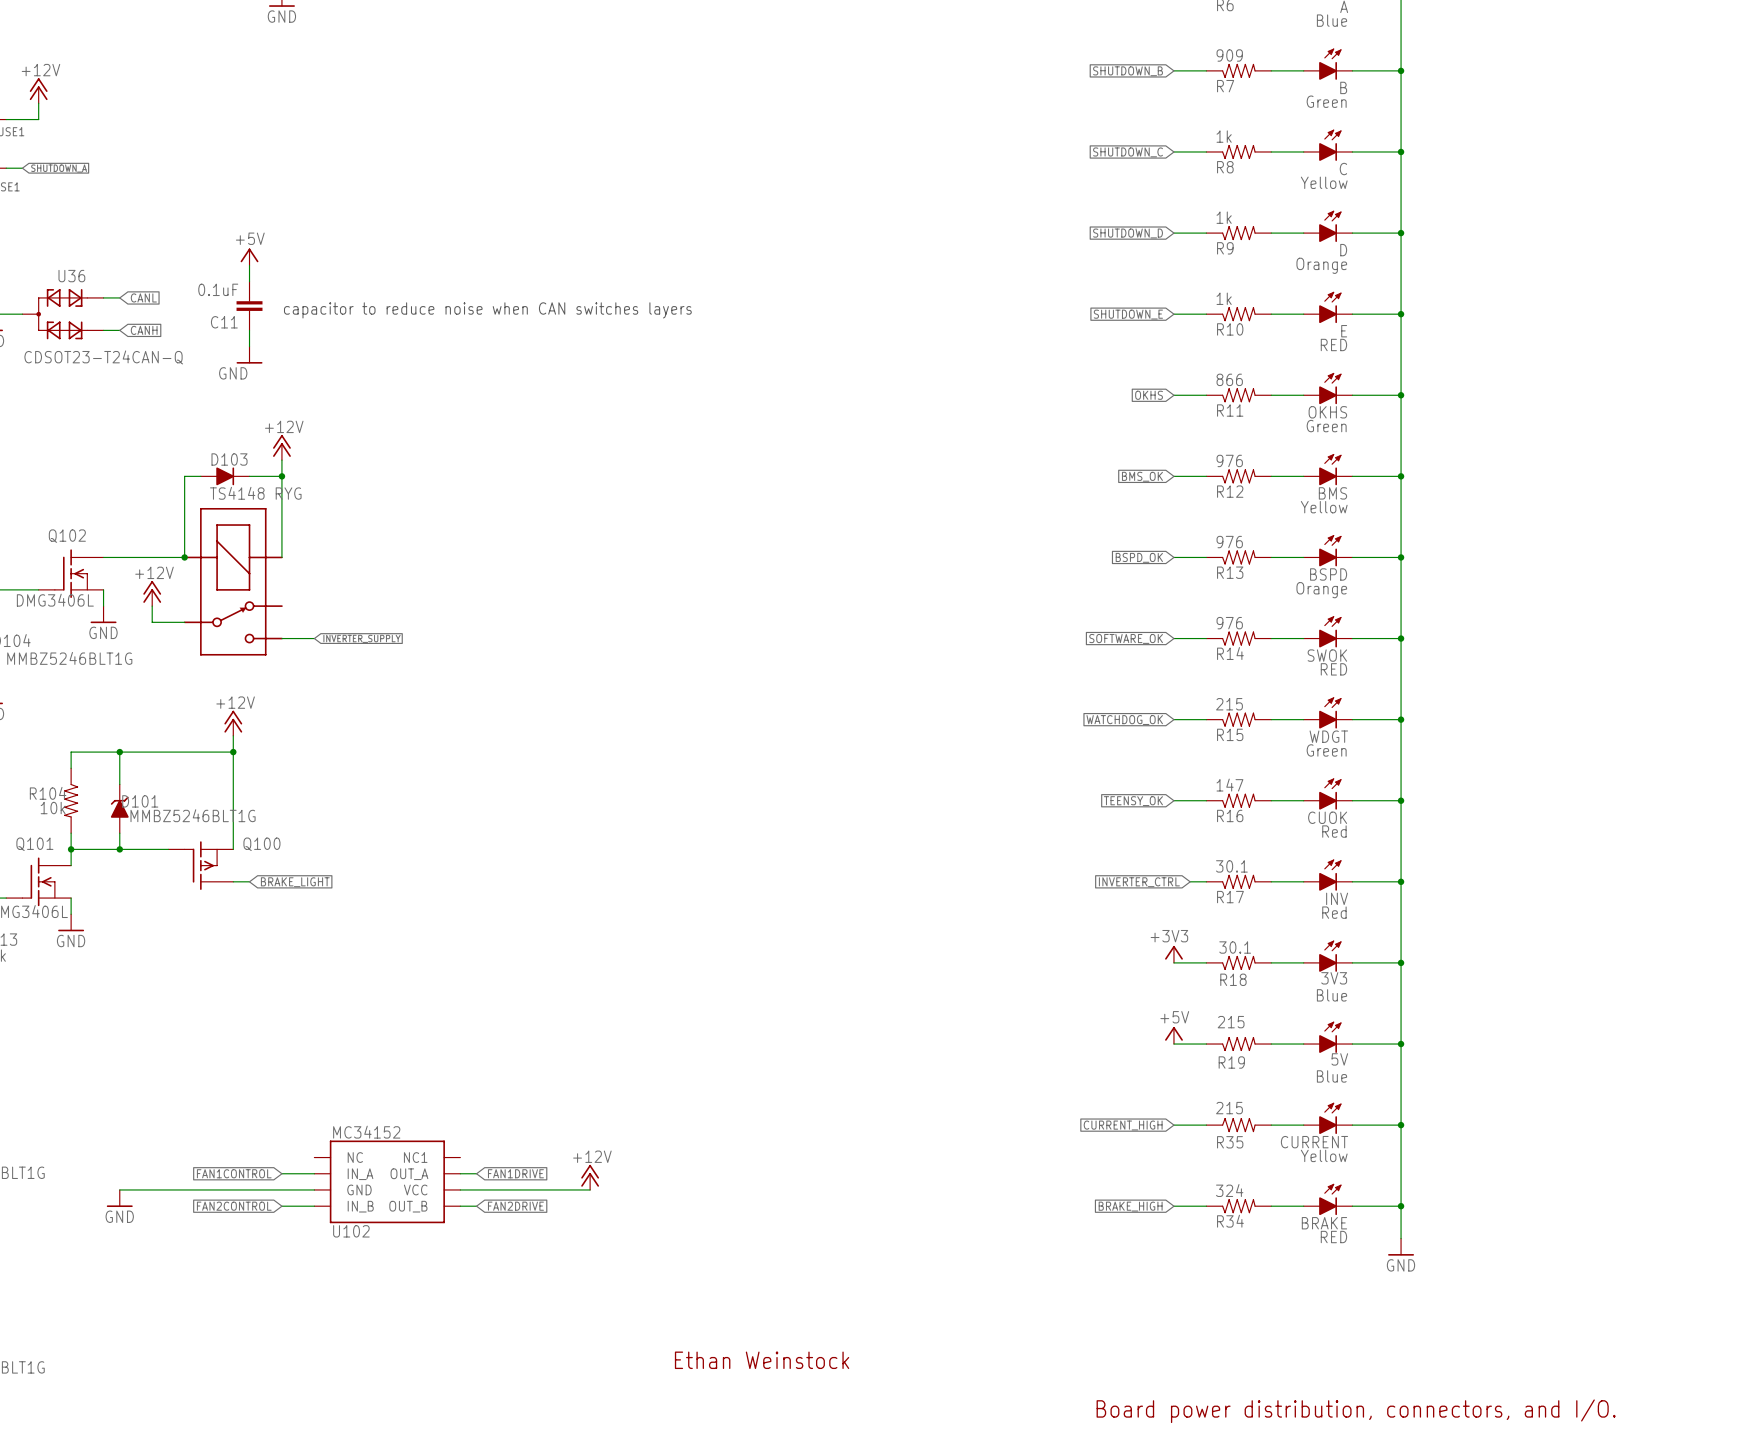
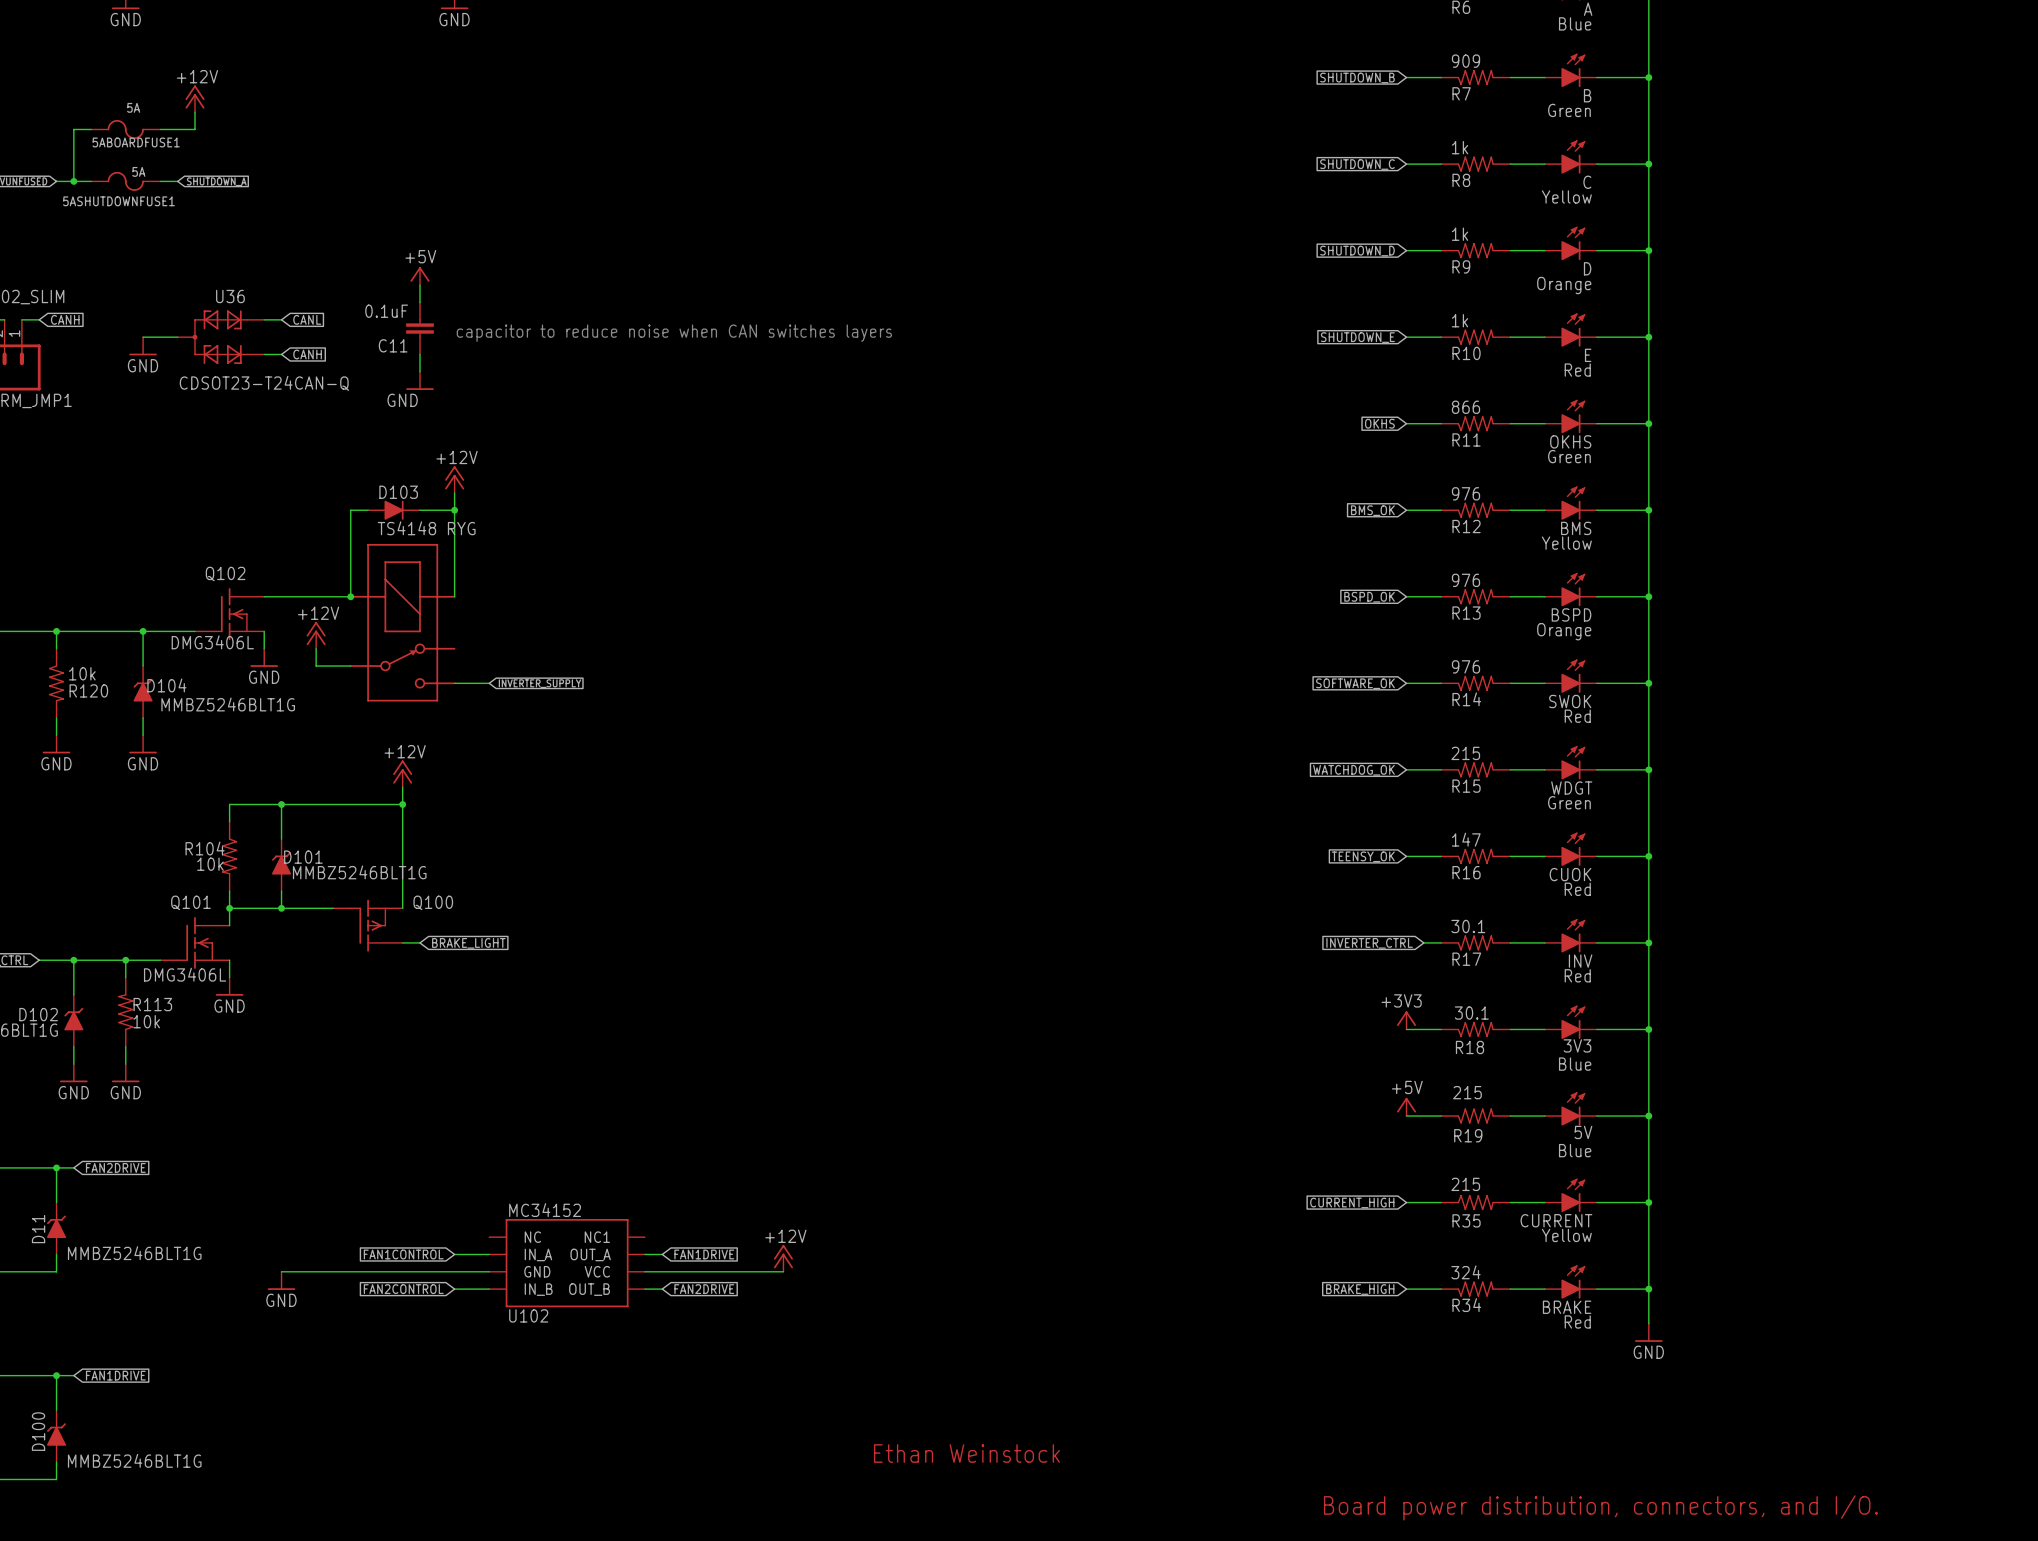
E value: RED (1333, 344) -> Red (1577, 370)
SWOK value: RED (1333, 669) -> Red (1577, 716)
BRAKE value: RED (1333, 1237) -> Red (1577, 1321)

